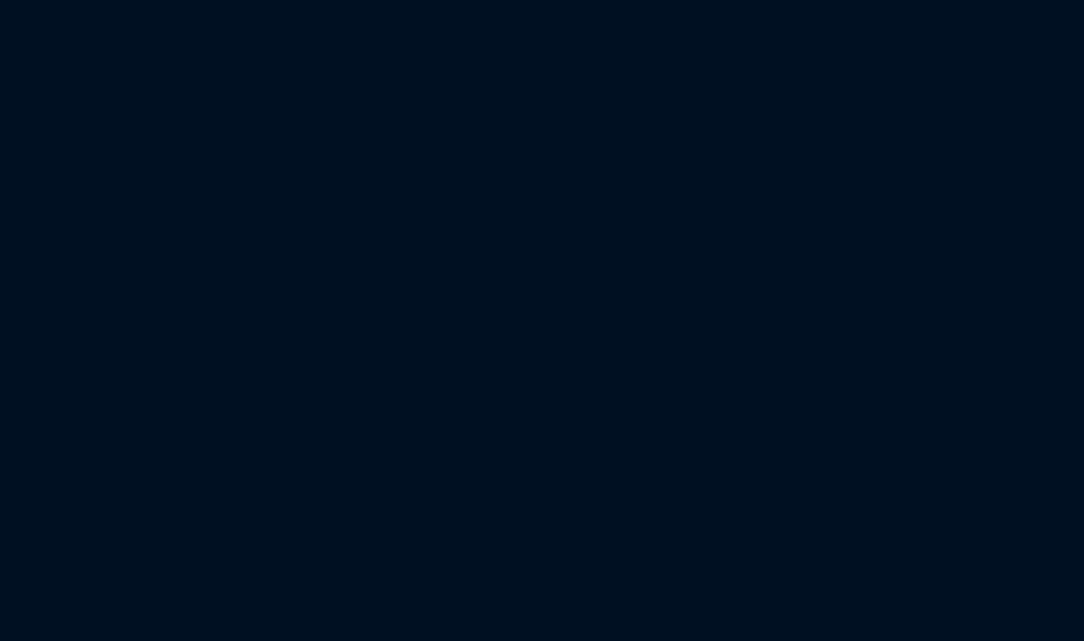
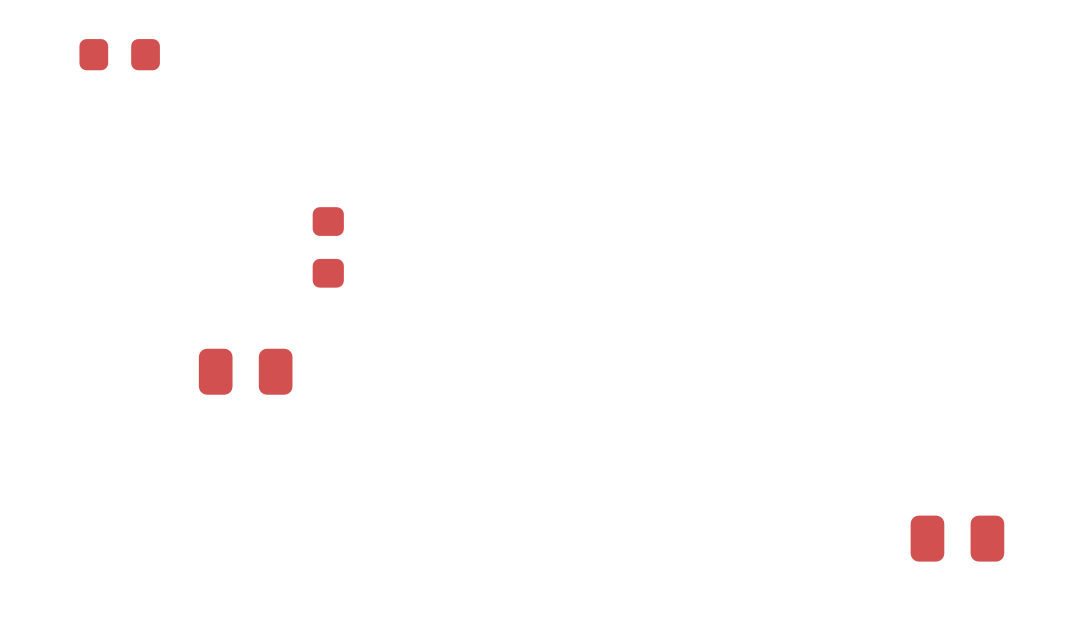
part: none -> (119, 54)
part: none -> (328, 247)
part: none -> (245, 371)
part: none -> (957, 538)

